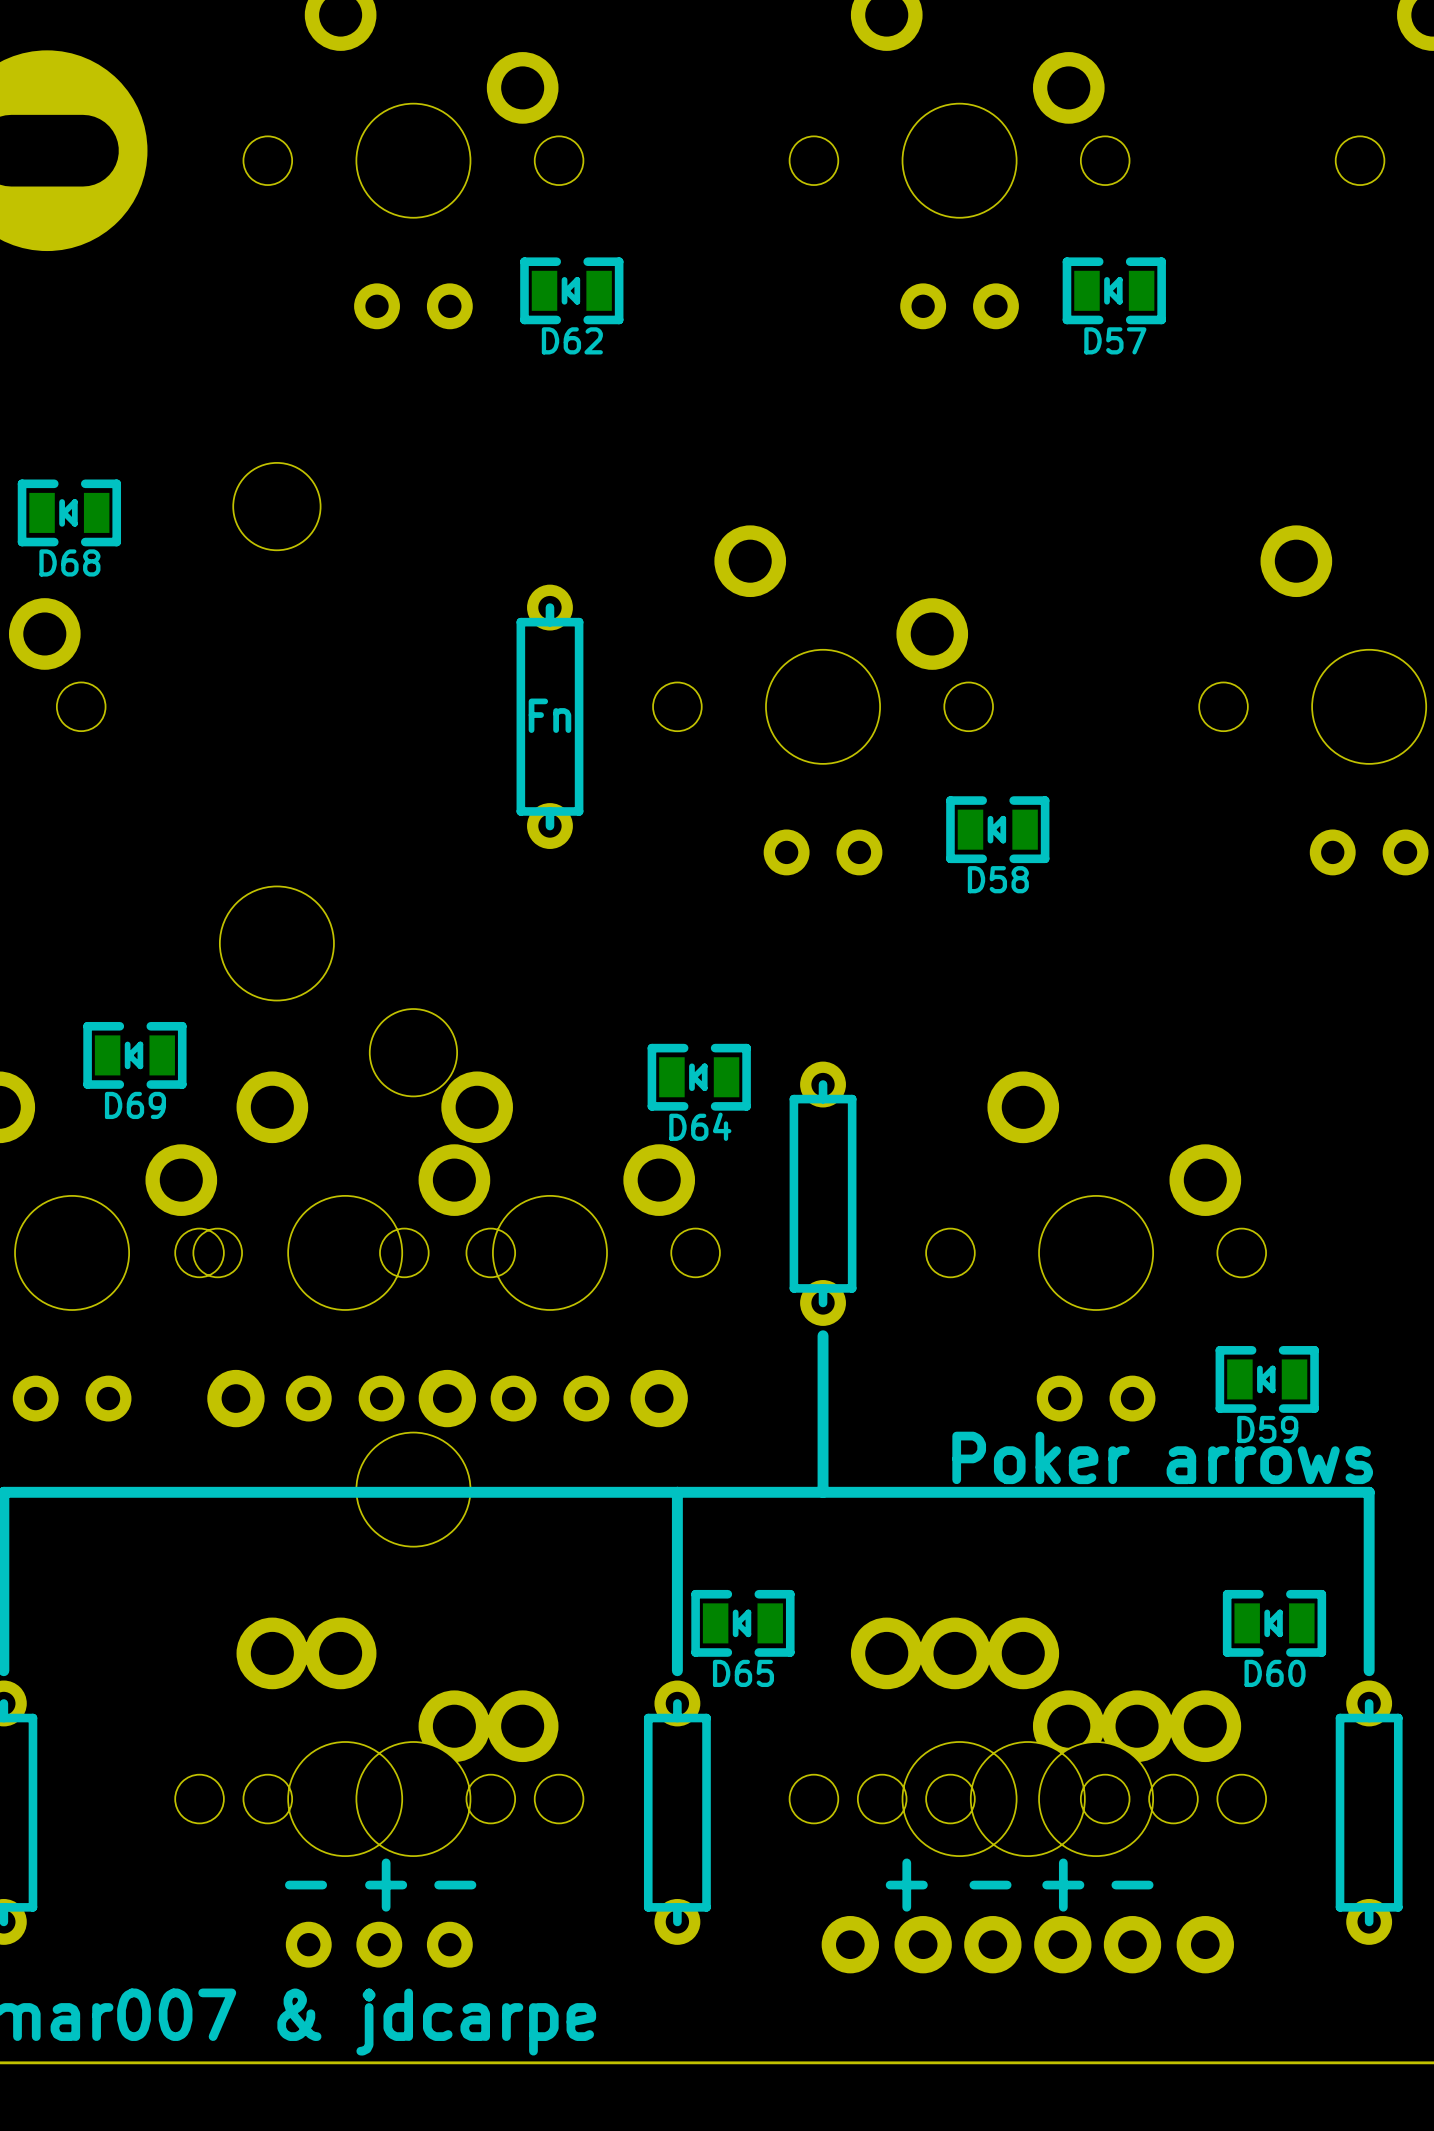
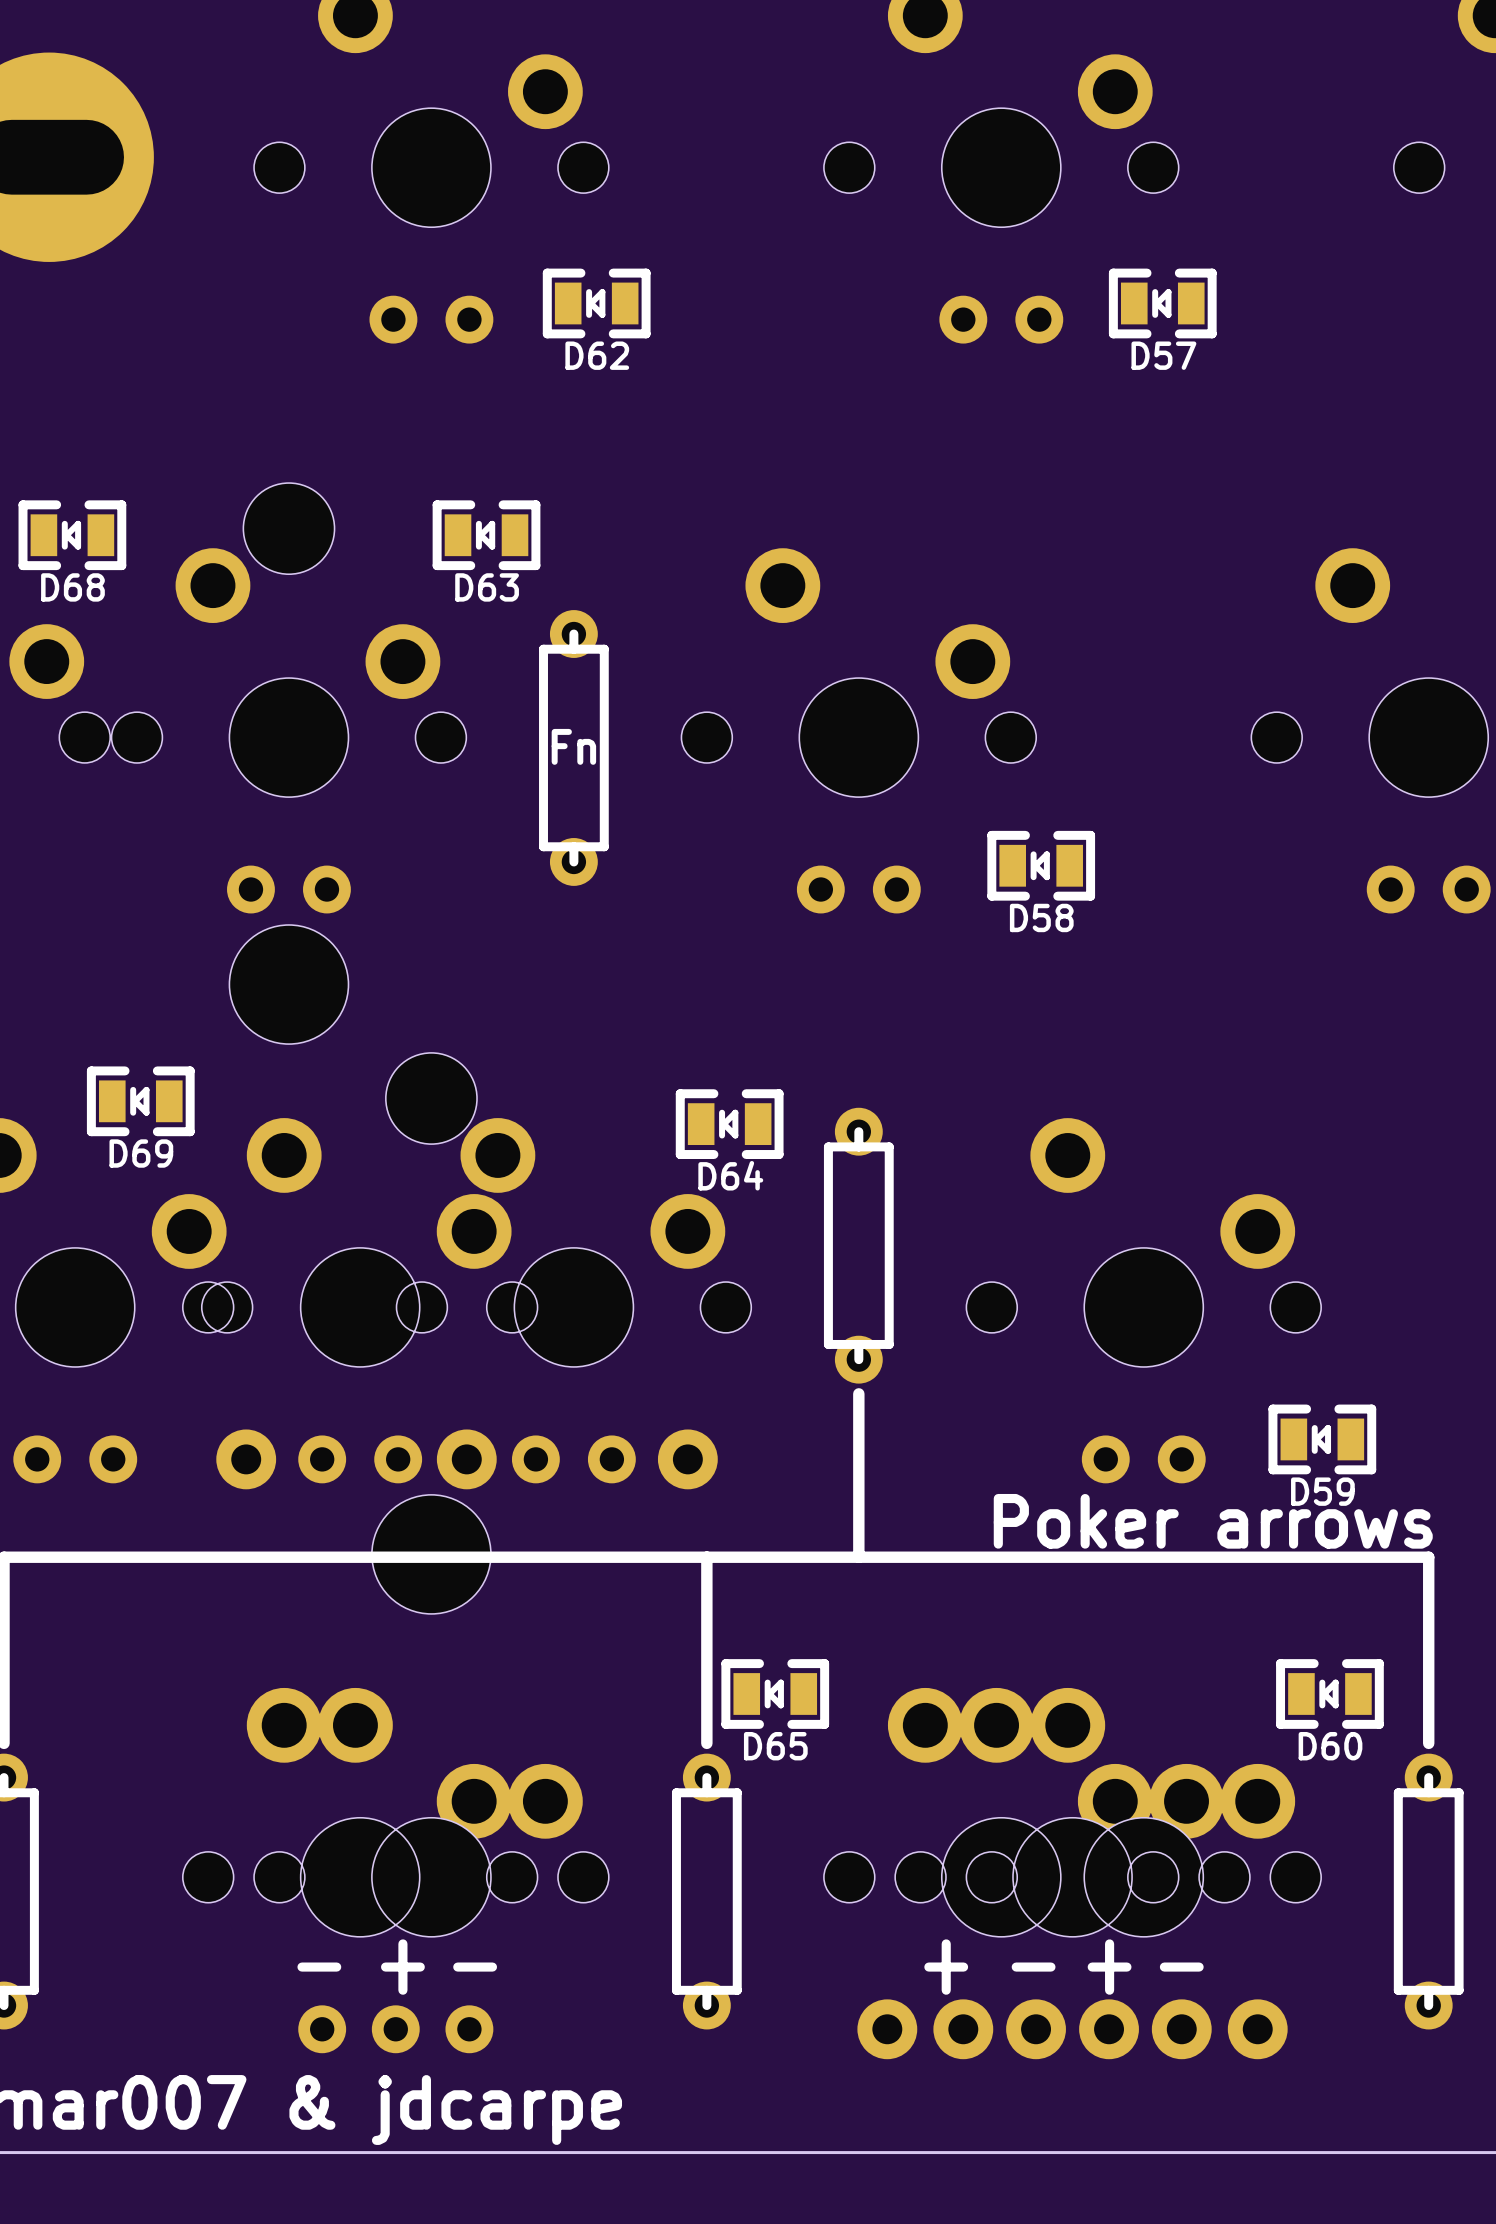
D63: none -> (486, 535)
part: none -> (288, 672)
part: none -> (288, 889)

